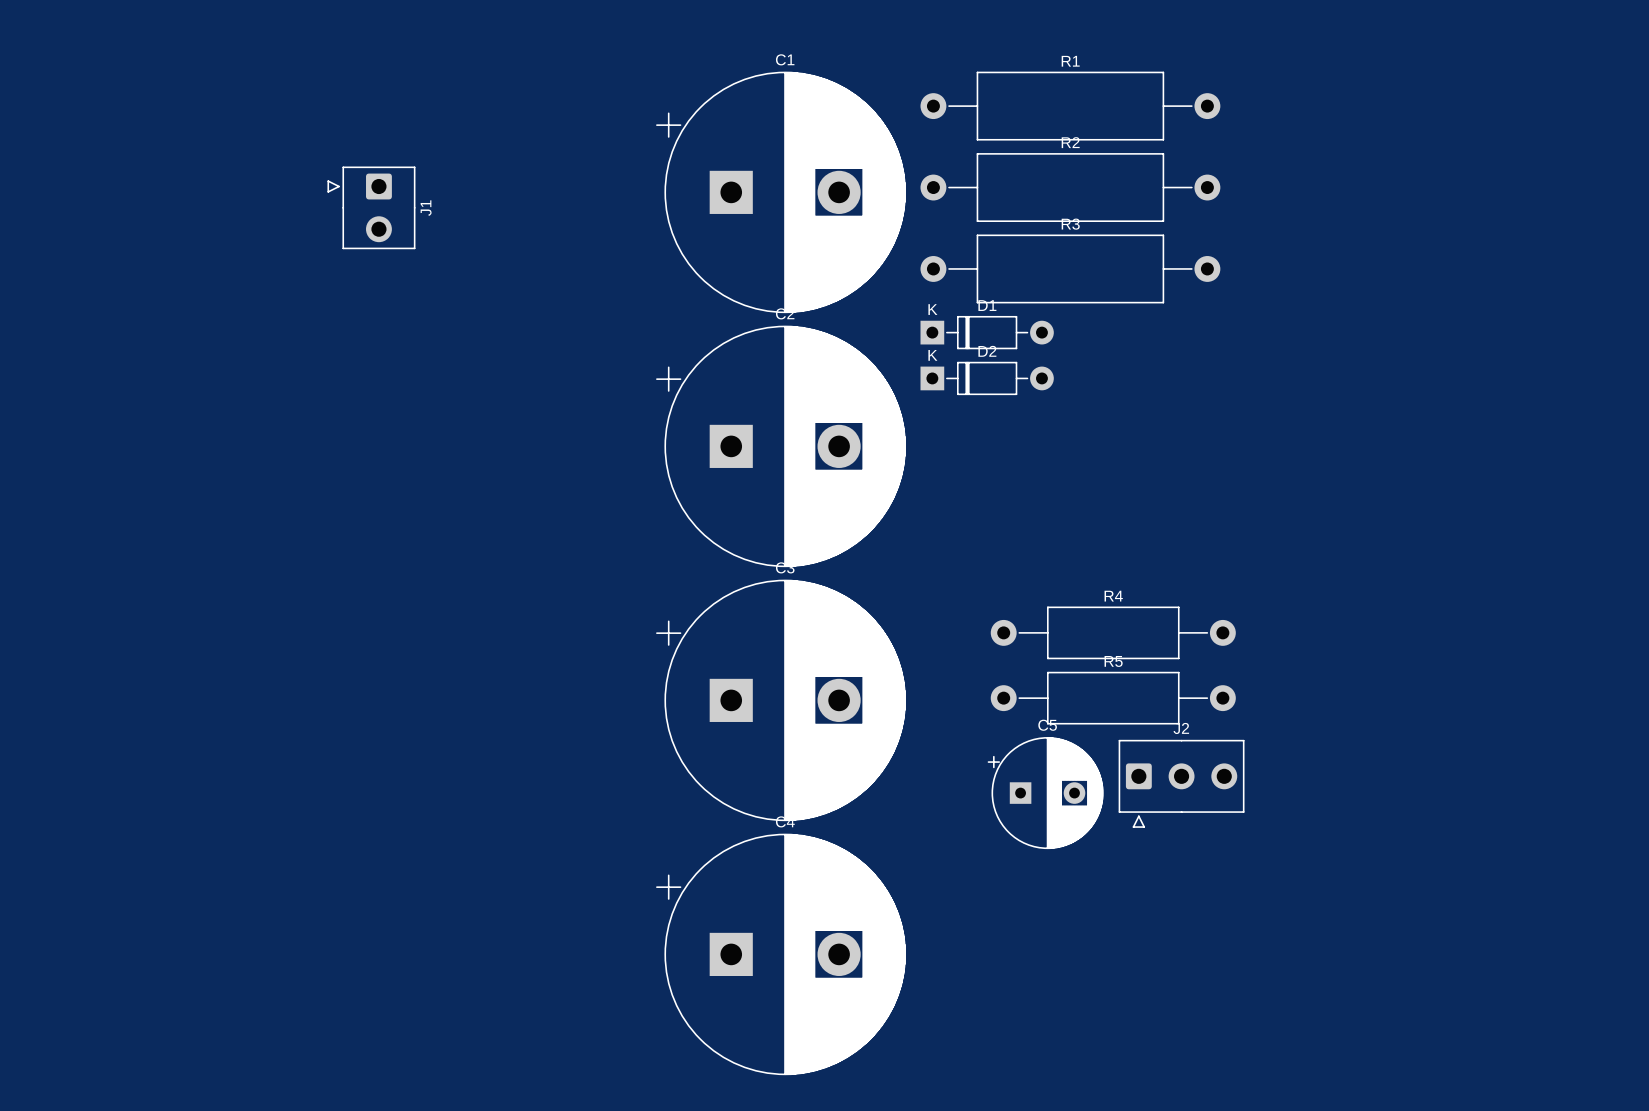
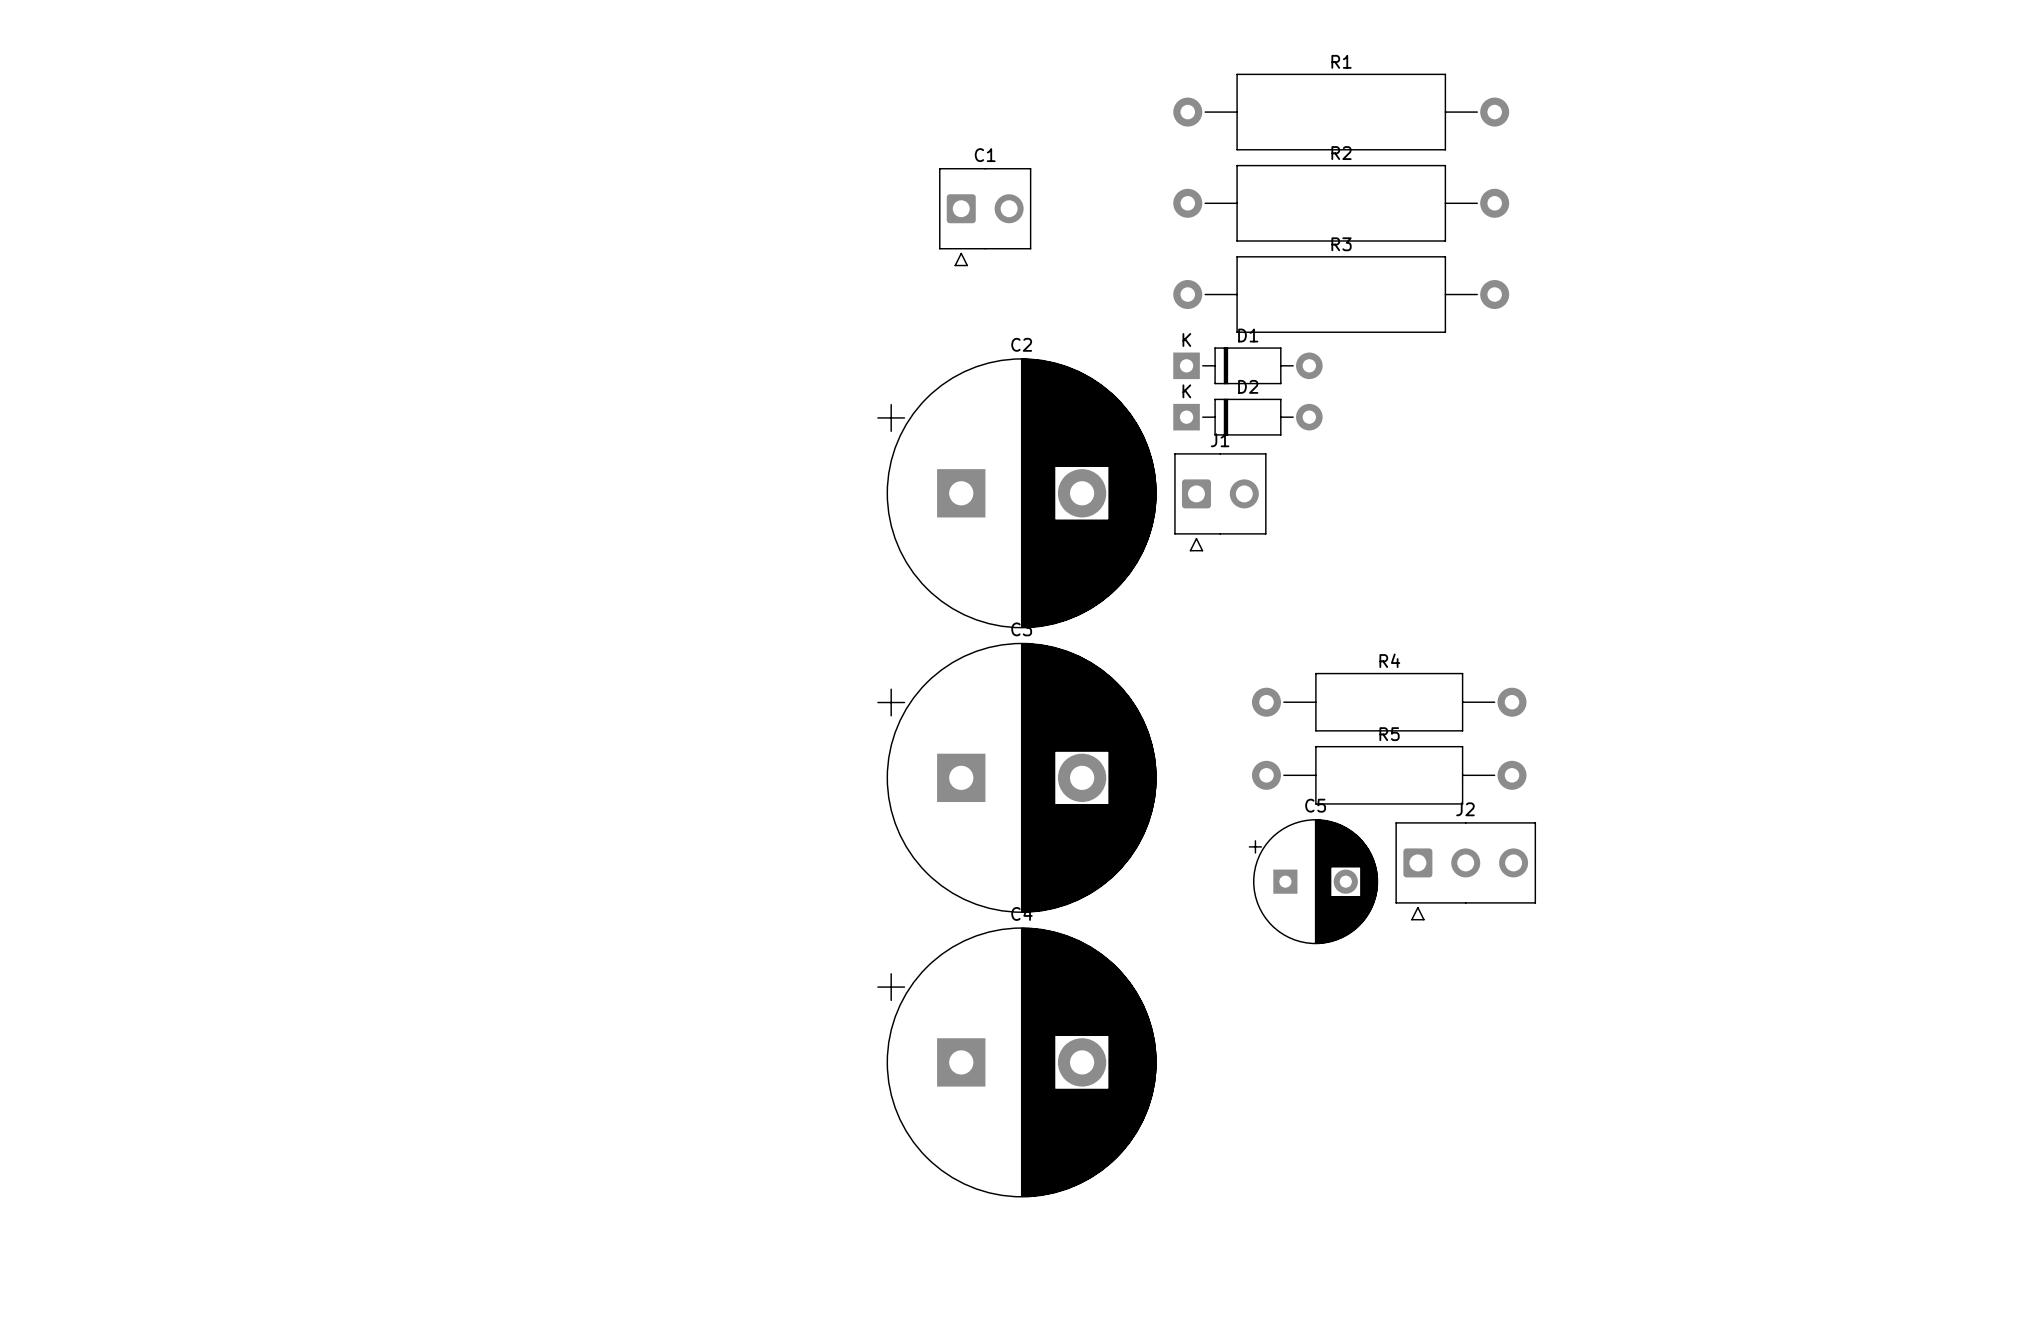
C1 name position: C1 (785, 59) -> C1 (985, 155)
C1 footprint: [656, 71, 906, 313] -> [939, 168, 1032, 267]
J1 rotation: 0° (371, 207) -> 90° counterclockwise (1220, 502)
J1 position: (371, 207) -> (1220, 502)

